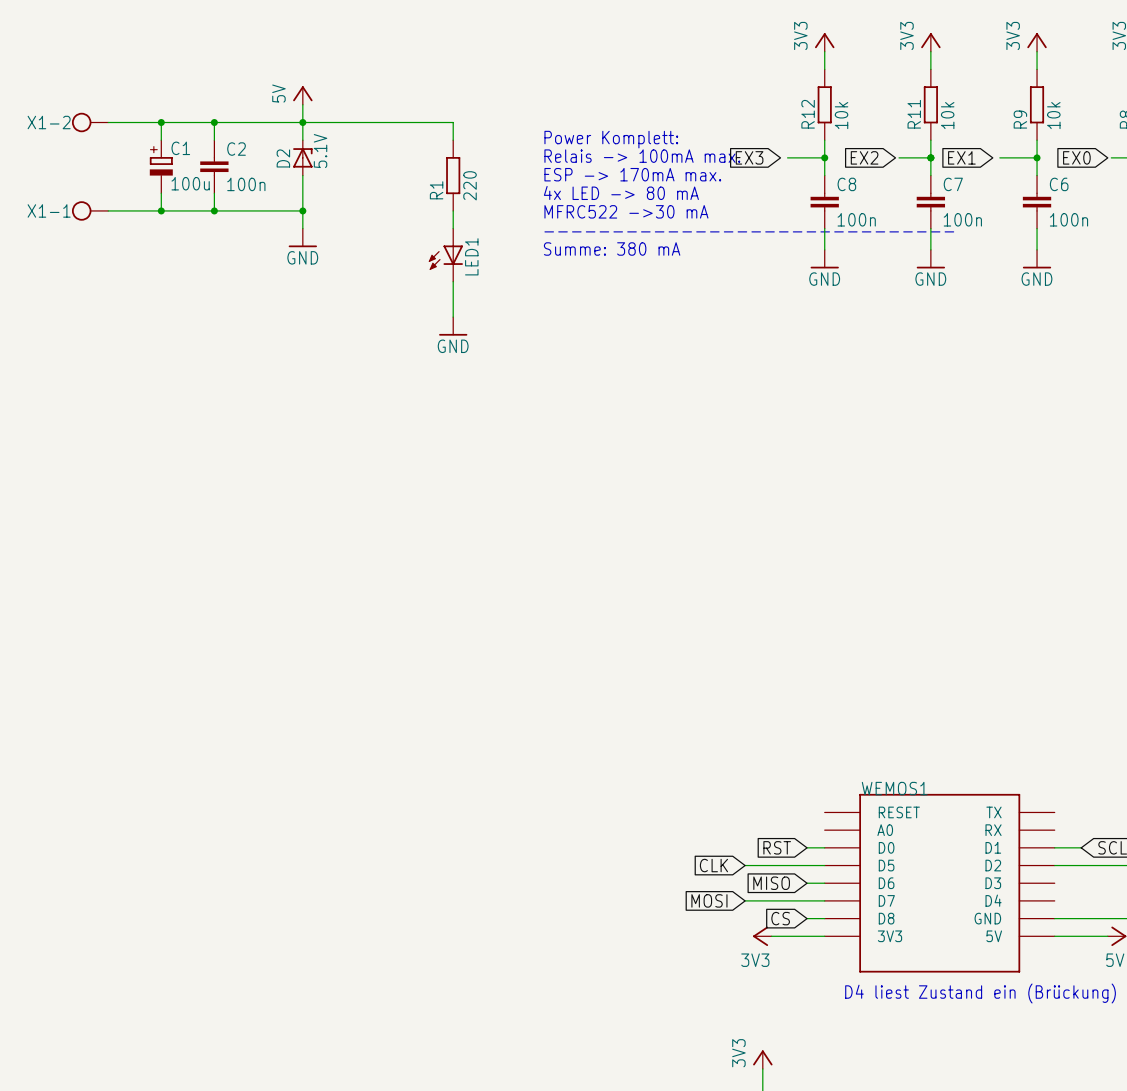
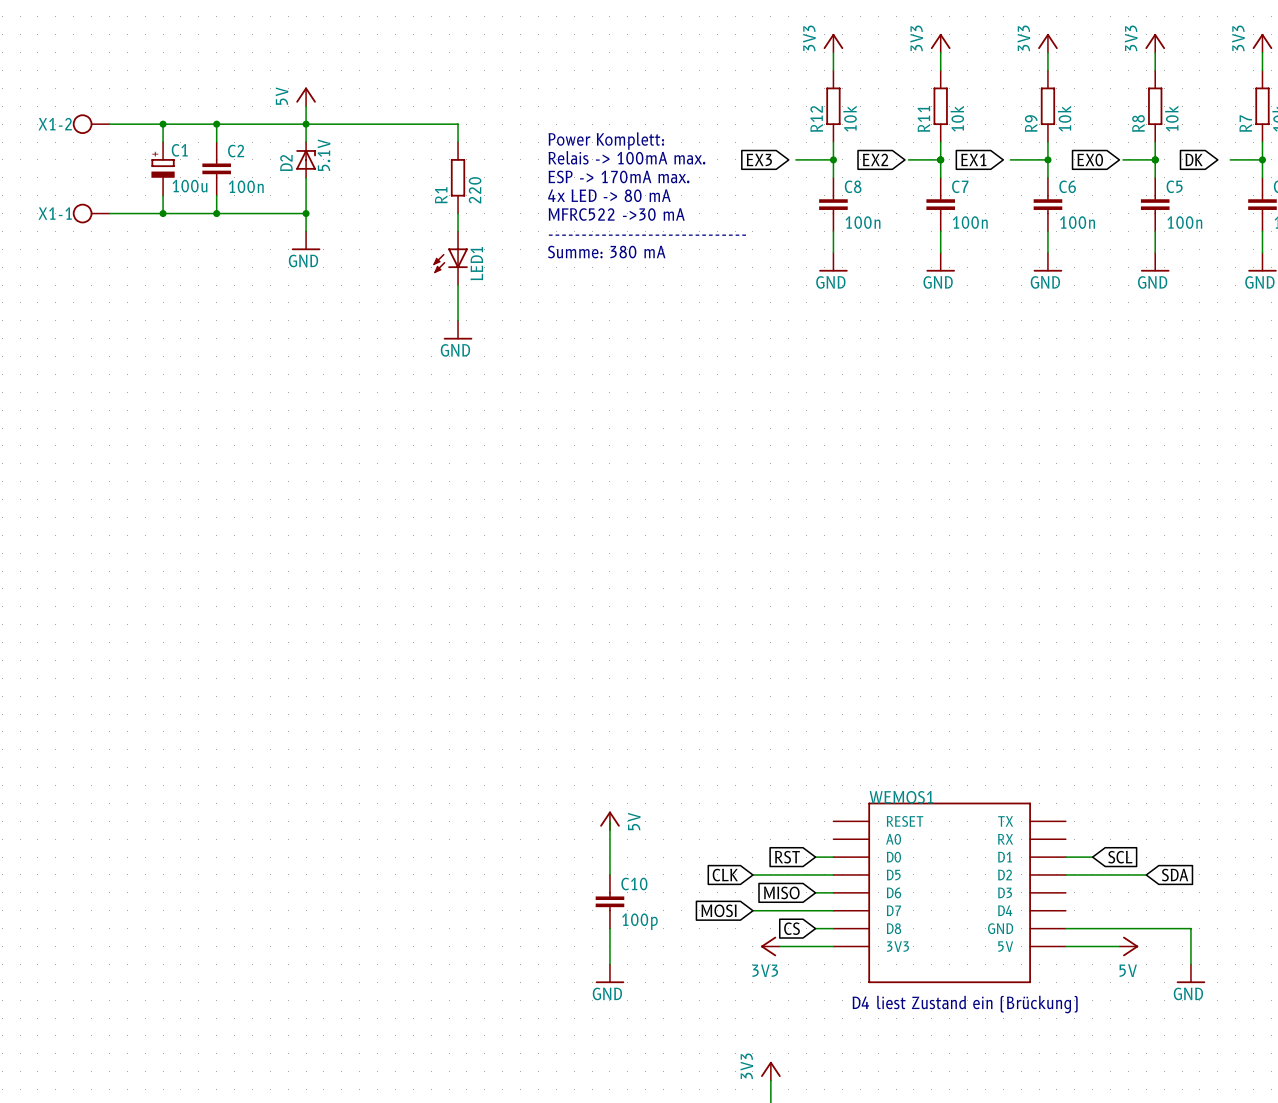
wire: none -> (609, 821) (609, 874)
power symbol: none -> 5V (609, 820)
C10: none -> 100p (609, 901)
wire: none -> (609, 928) (609, 964)
power symbol: none -> GND (609, 973)

